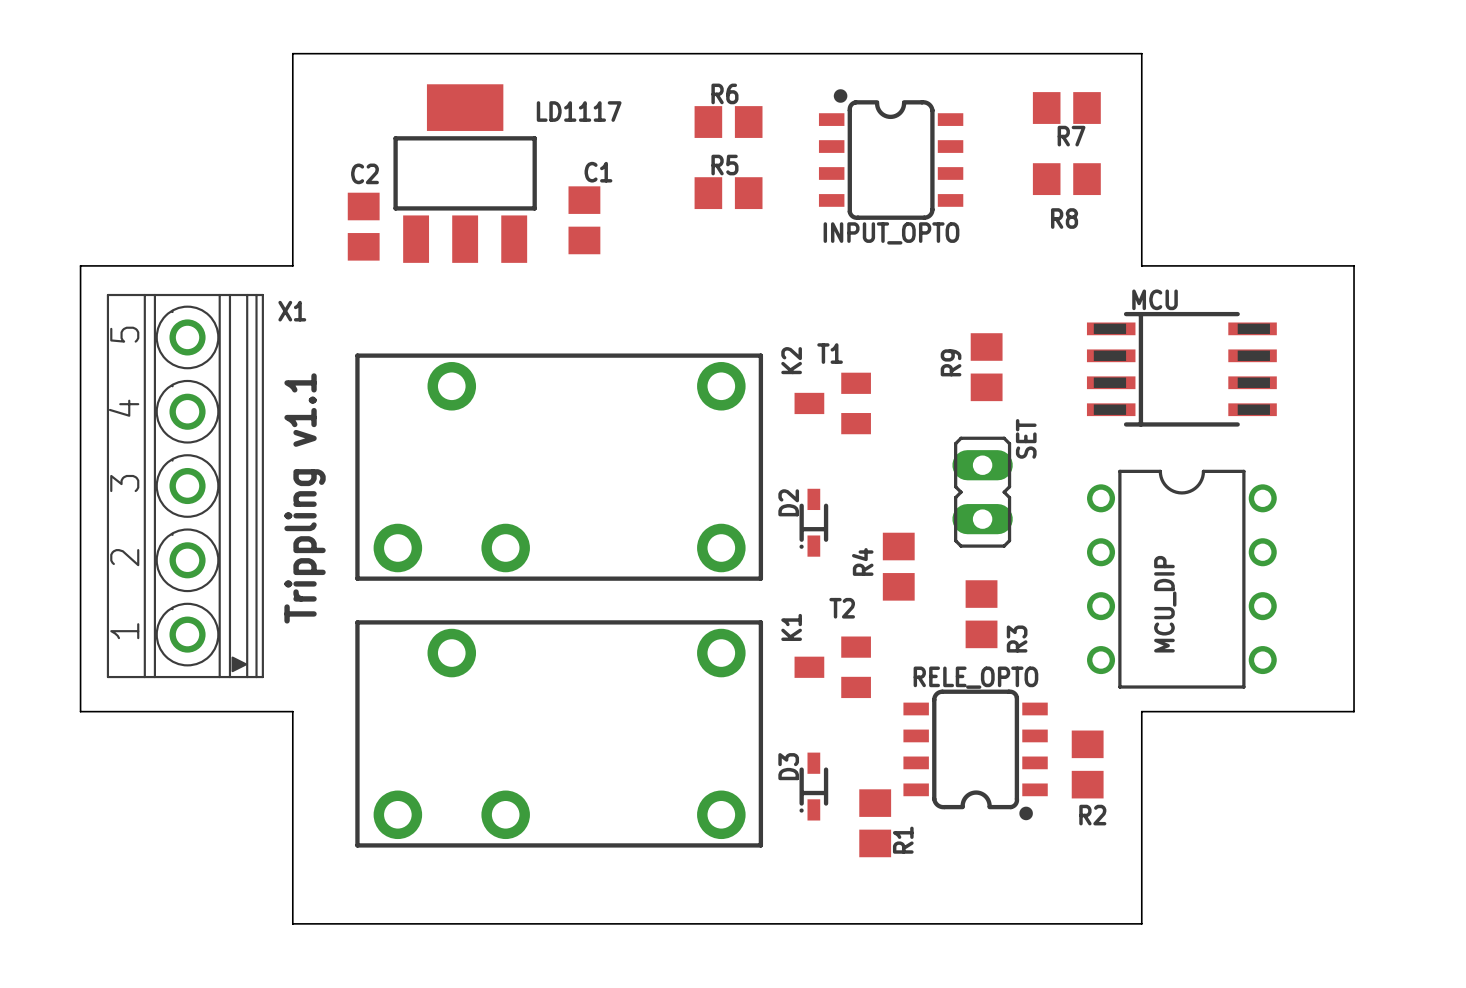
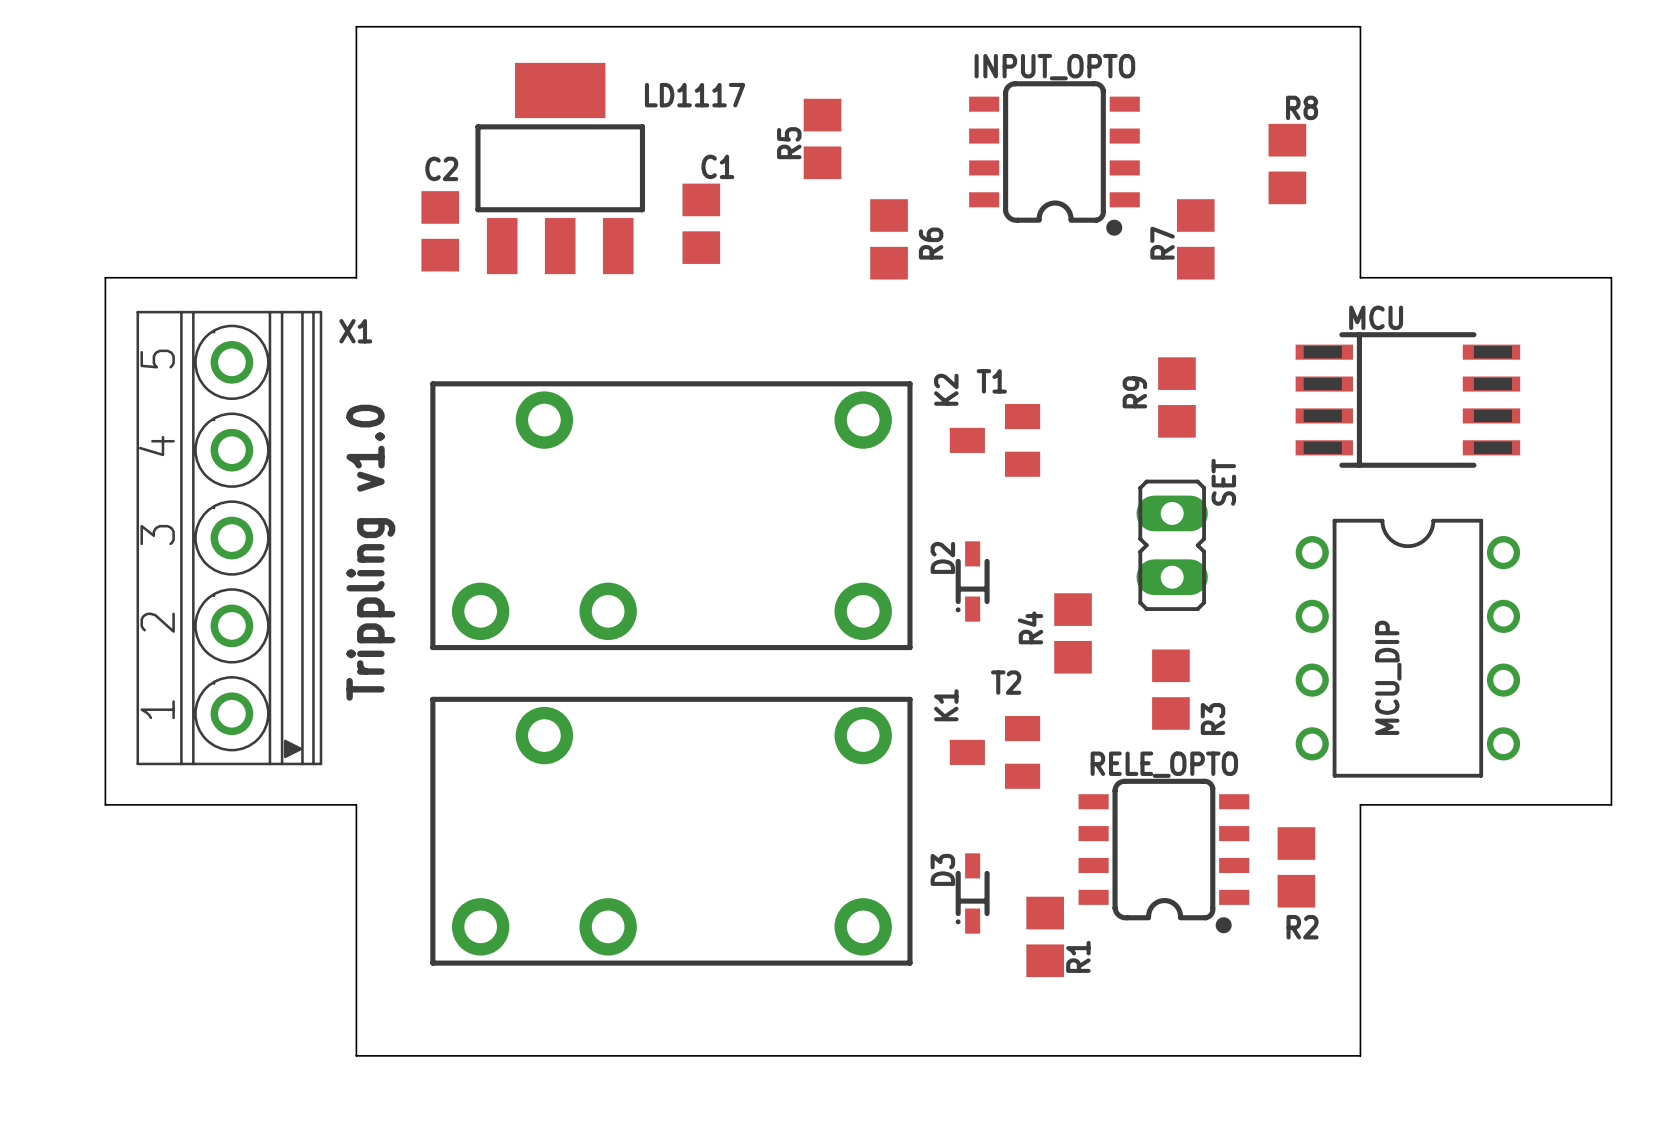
R7 rotation: 0° (1066, 108) -> 90° clockwise (1195, 239)
R7 position: (1066, 108) -> (1195, 239)
R6 rotation: 0° (728, 122) -> 90° clockwise (889, 239)
R6 position: (728, 122) -> (889, 239)
INPUT_OPTO rotation: 0° (891, 154) -> 180° (1054, 158)
R8 rotation: 0° (1066, 179) -> 90° clockwise (1287, 164)
R5 rotation: 0° (728, 193) -> 90° clockwise (822, 138)
R5 position: (728, 193) -> (822, 138)
R8 name position: R8 (1064, 218) -> R8 (1302, 107)
text: Trippling v1.1 (305, 498) -> Trippling v1.0 (370, 552)

